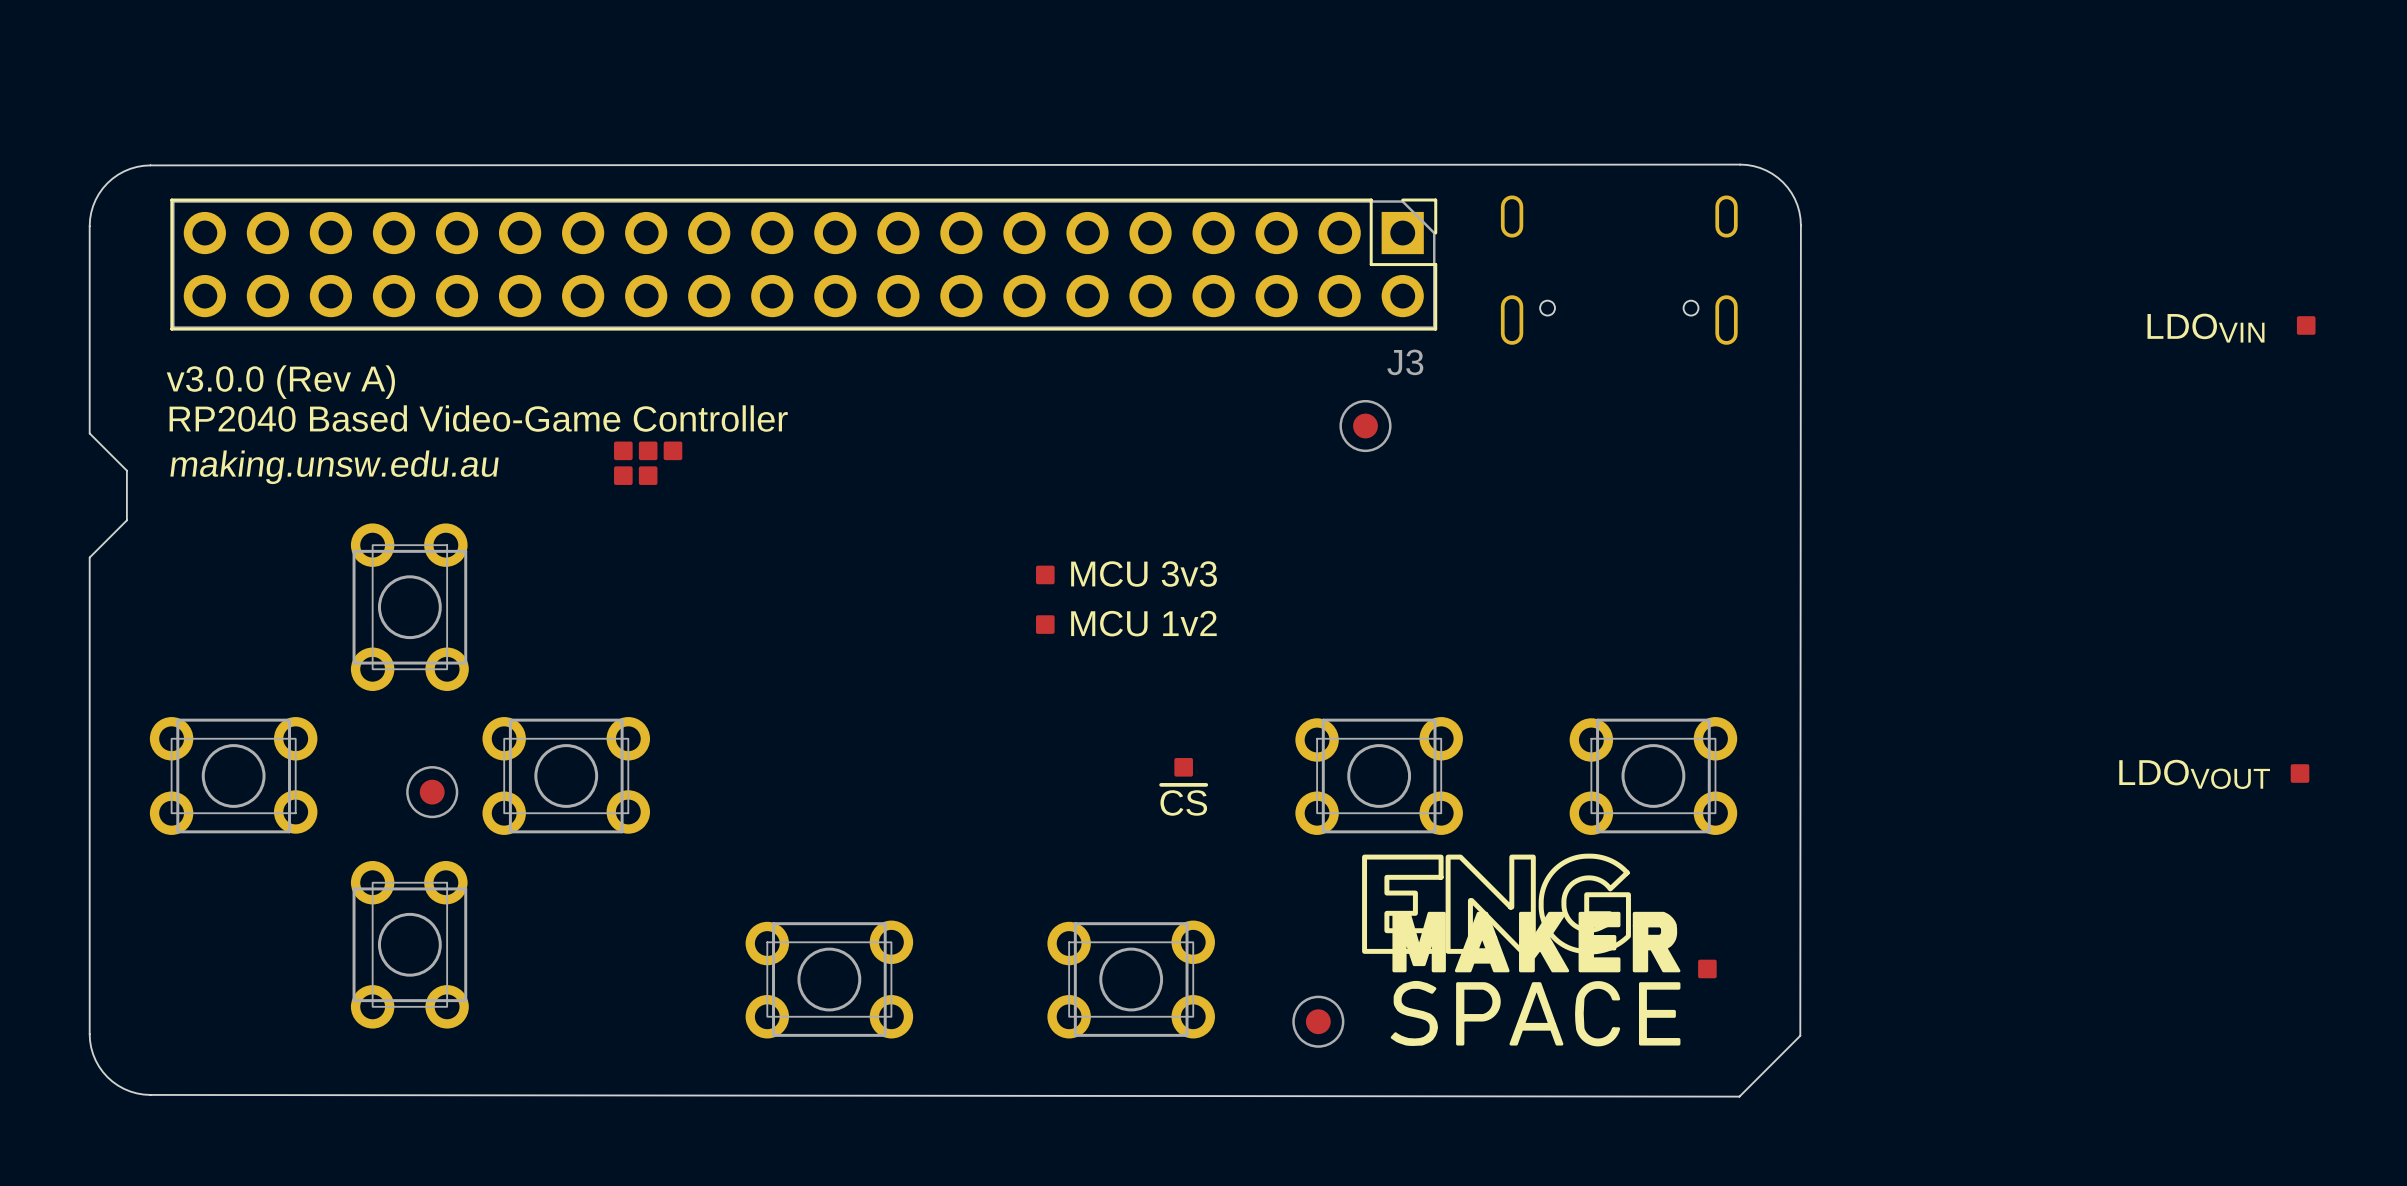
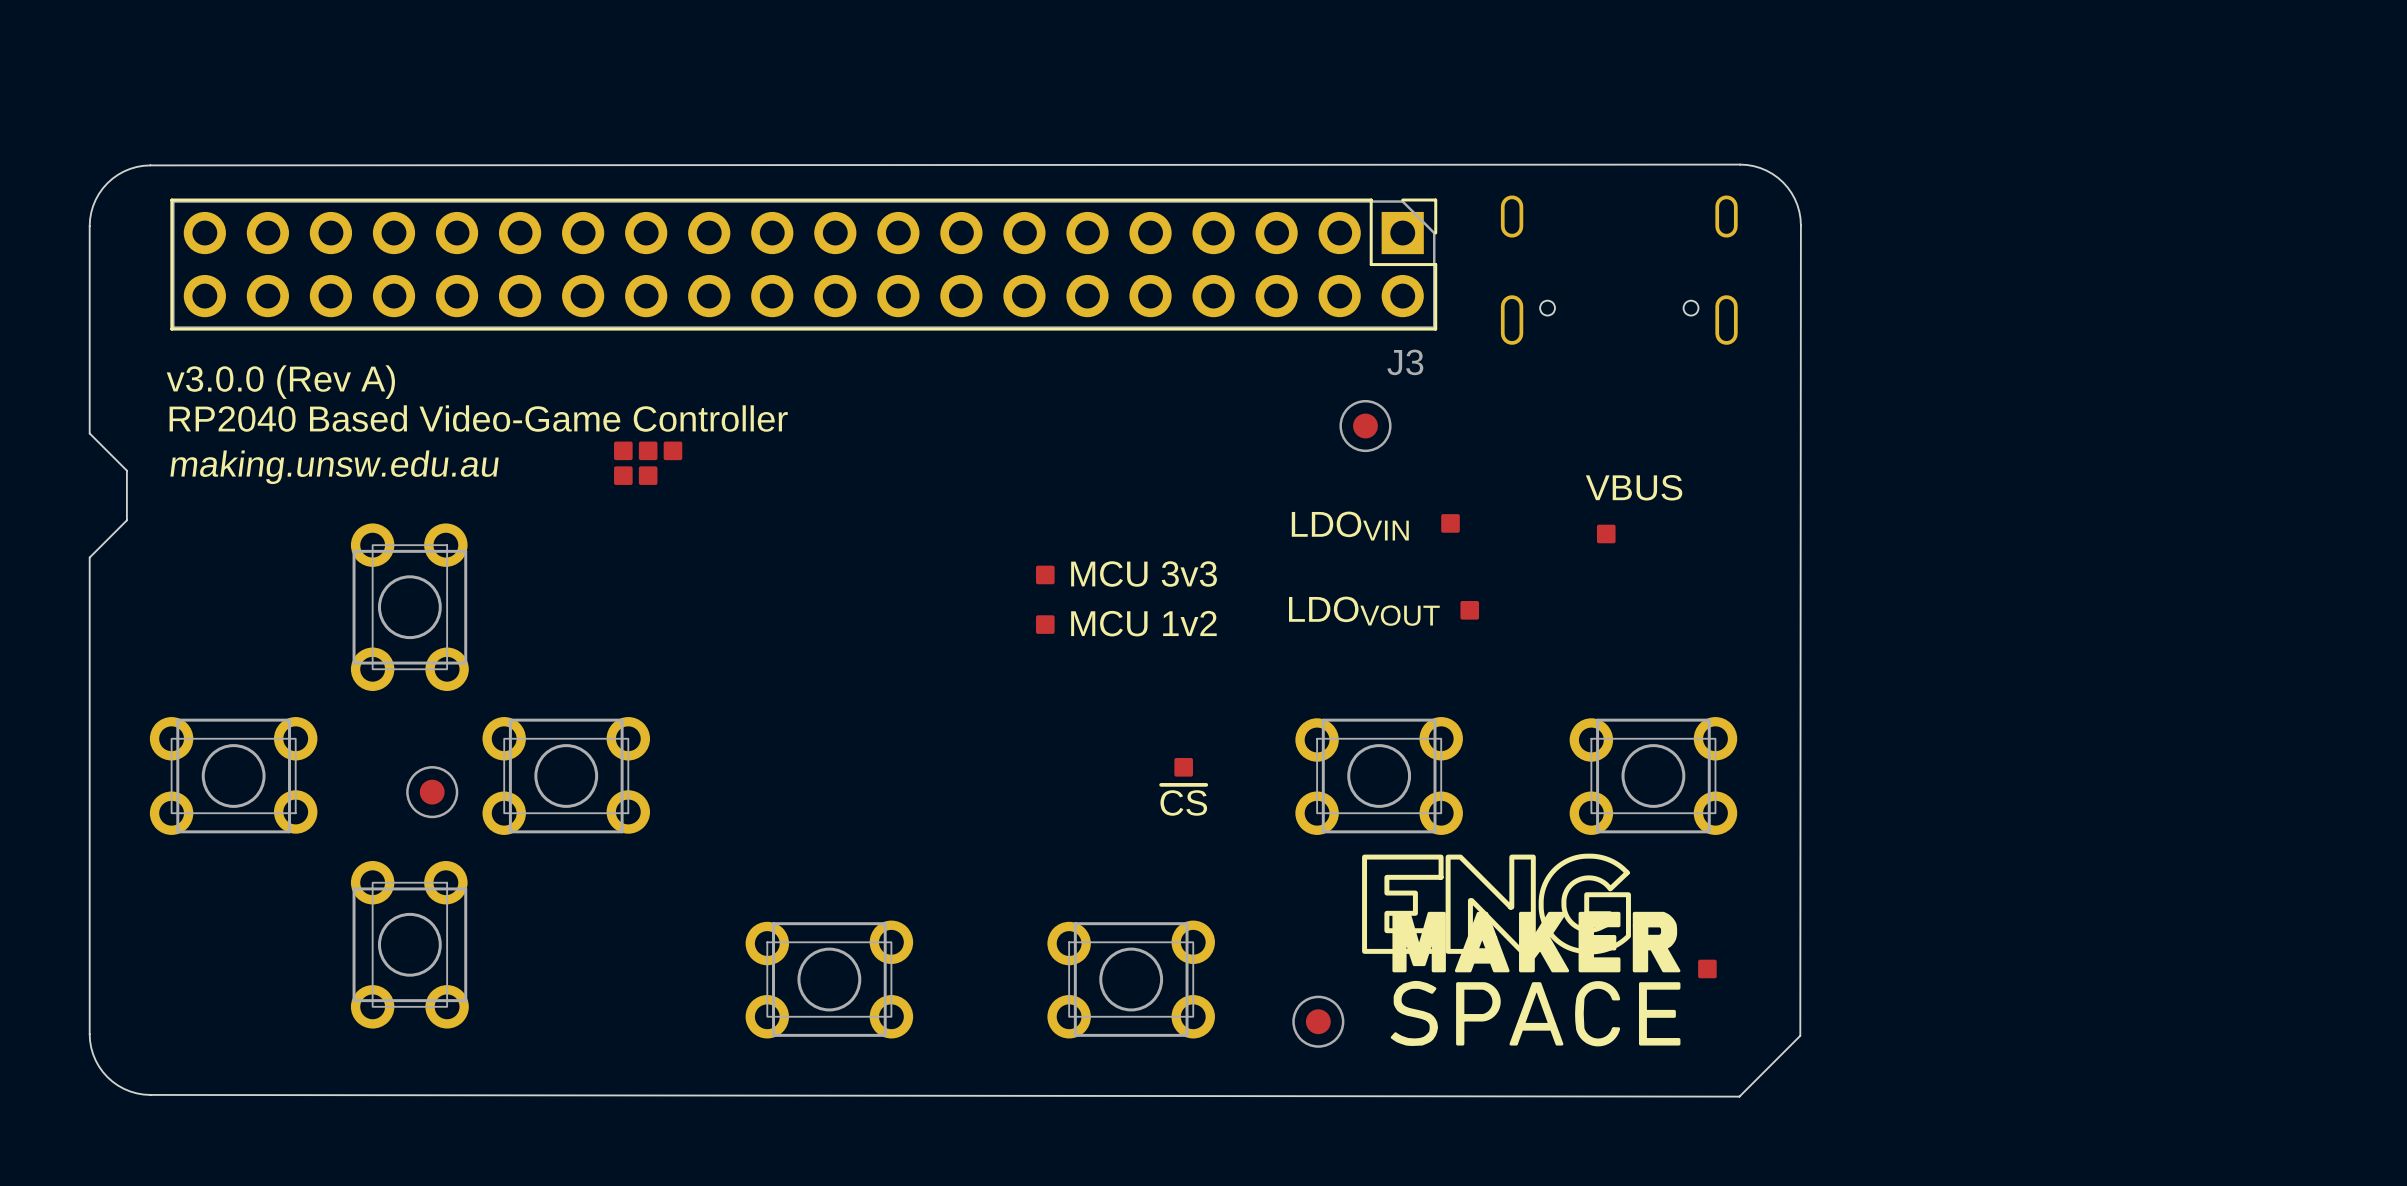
part: LDOVIN (2306, 325) -> none
part: none -> LDOVIN (1450, 523)
part: none -> VBUS (1606, 533)
part: none -> LDOVOUT (1469, 610)
part: LDOVOUT (2300, 773) -> none

